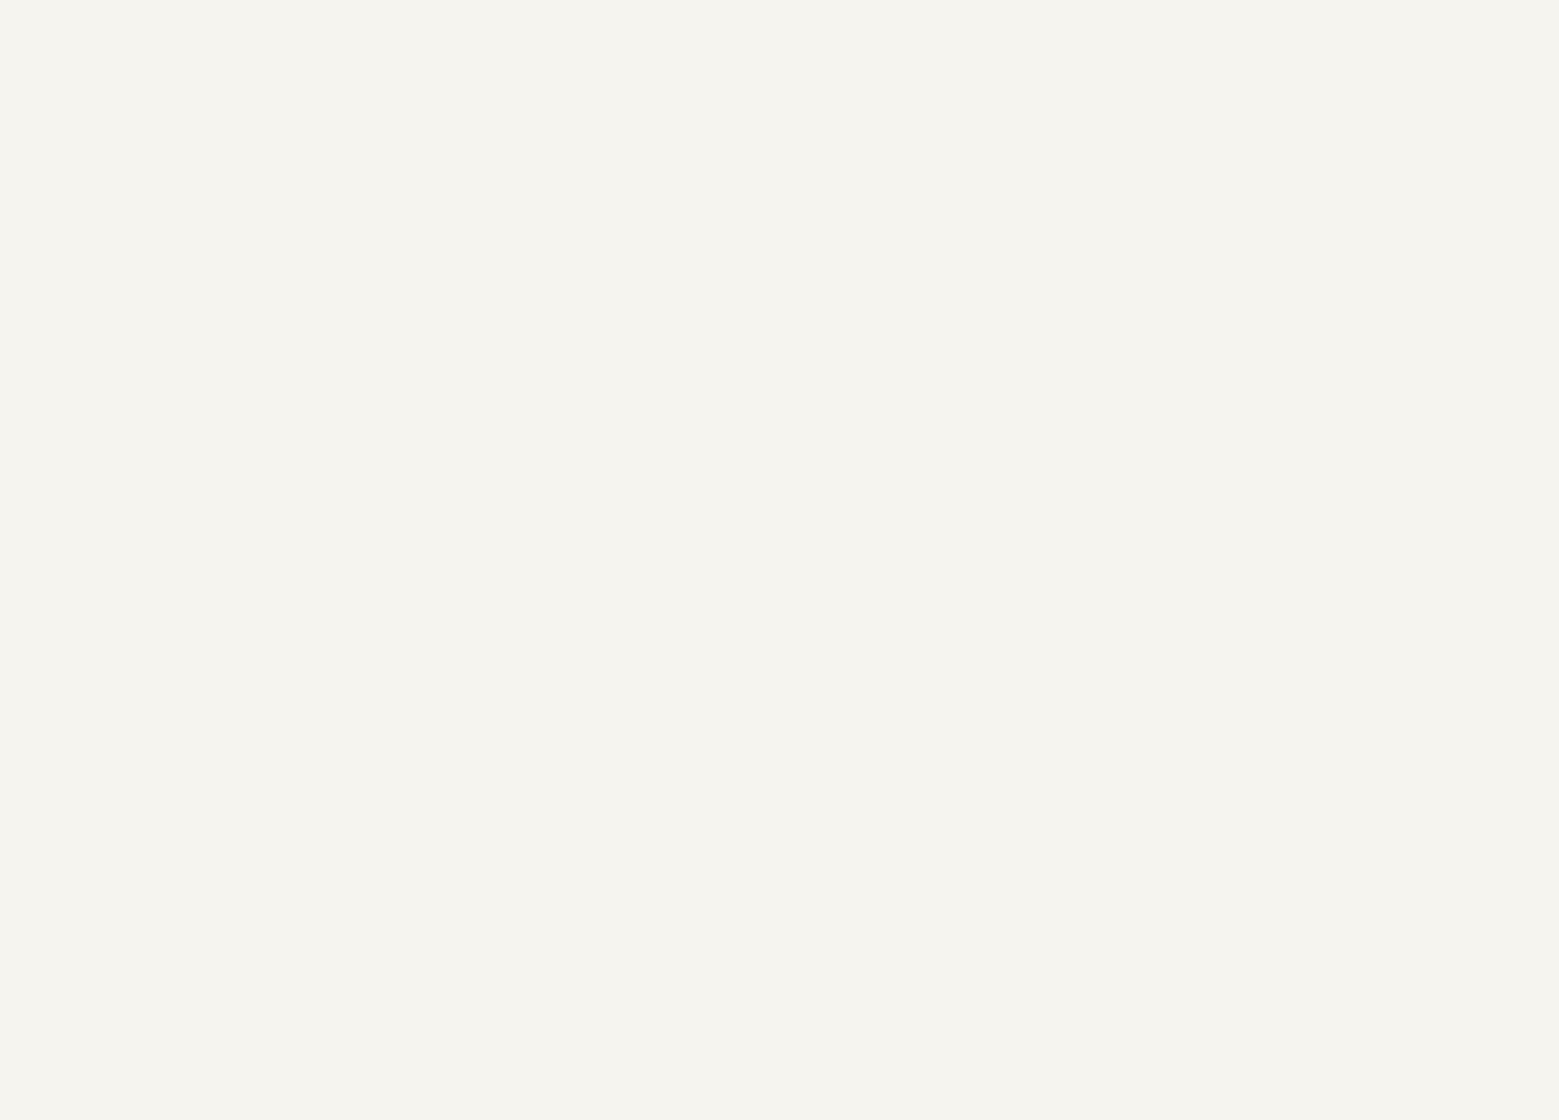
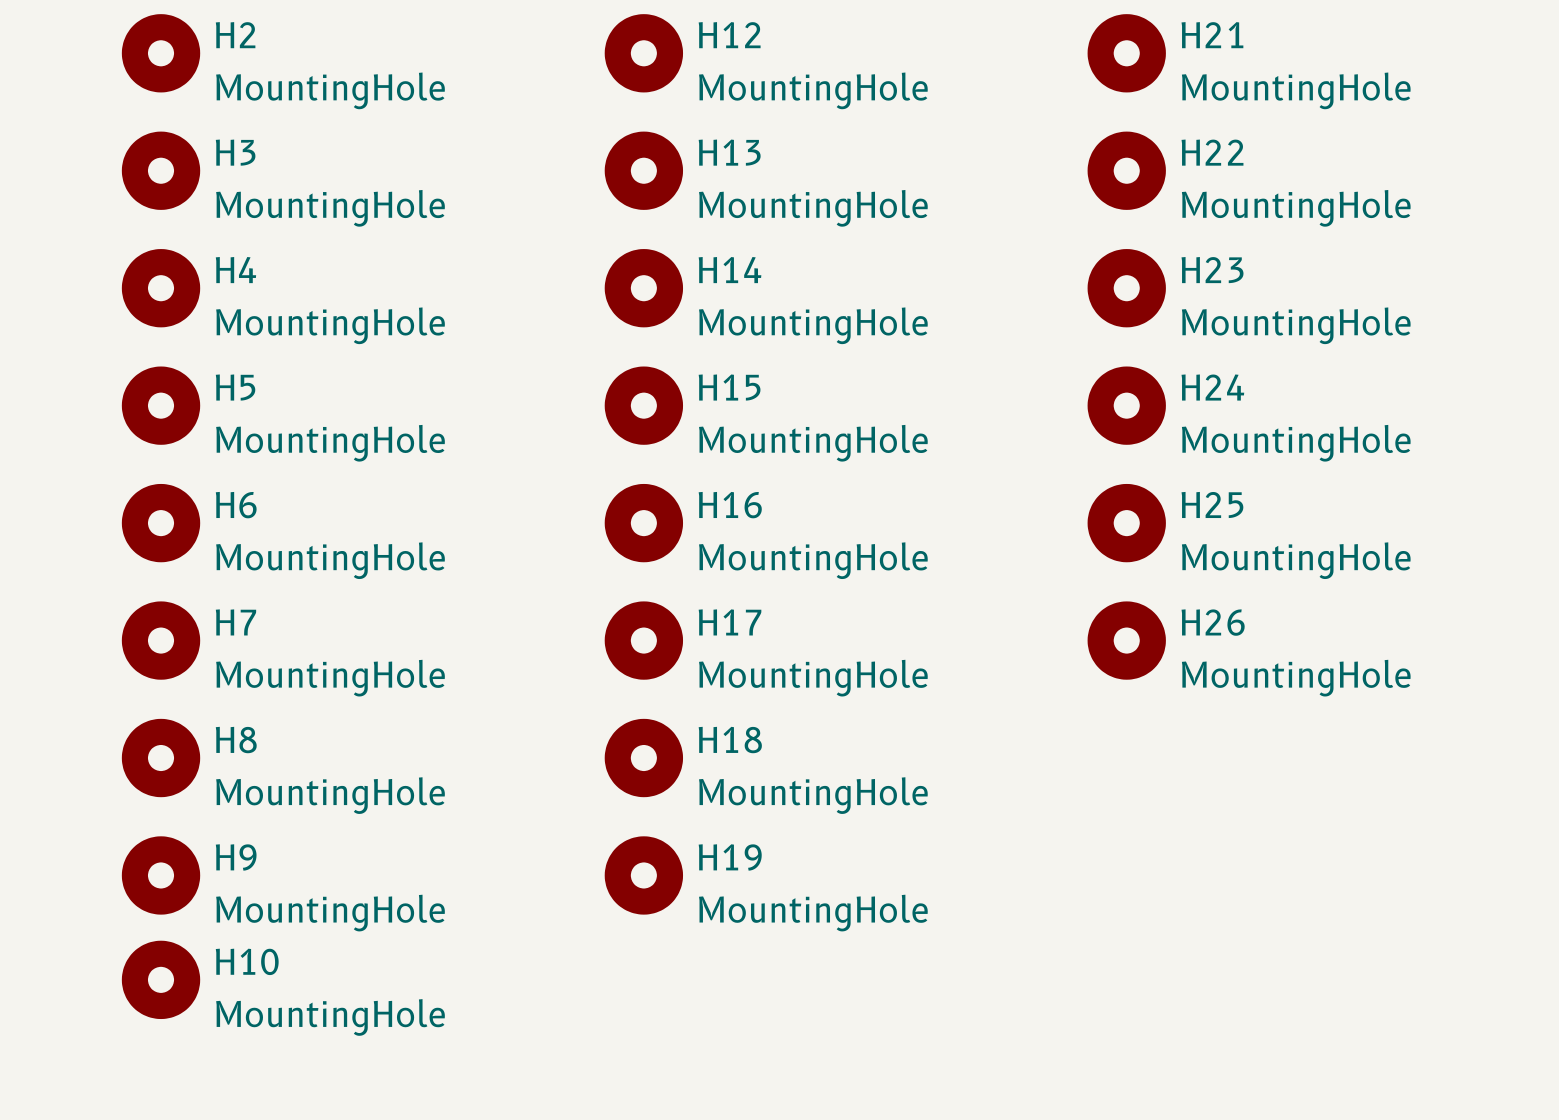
H2: none -> MountingHole (161, 53)
H12: none -> MountingHole (643, 53)
H21: none -> MountingHole (1126, 53)
H3: none -> MountingHole (161, 170)
H13: none -> MountingHole (643, 170)
H22: none -> MountingHole (1126, 170)
H4: none -> MountingHole (161, 288)
H14: none -> MountingHole (643, 288)
H23: none -> MountingHole (1126, 288)
H5: none -> MountingHole (161, 405)
H15: none -> MountingHole (643, 405)
H24: none -> MountingHole (1126, 405)
H6: none -> MountingHole (161, 523)
H16: none -> MountingHole (643, 523)
H25: none -> MountingHole (1126, 523)
H7: none -> MountingHole (161, 640)
H17: none -> MountingHole (643, 640)
H26: none -> MountingHole (1126, 640)
H8: none -> MountingHole (161, 758)
H18: none -> MountingHole (643, 758)
H9: none -> MountingHole (161, 875)
H19: none -> MountingHole (643, 875)
H10: none -> MountingHole (161, 979)

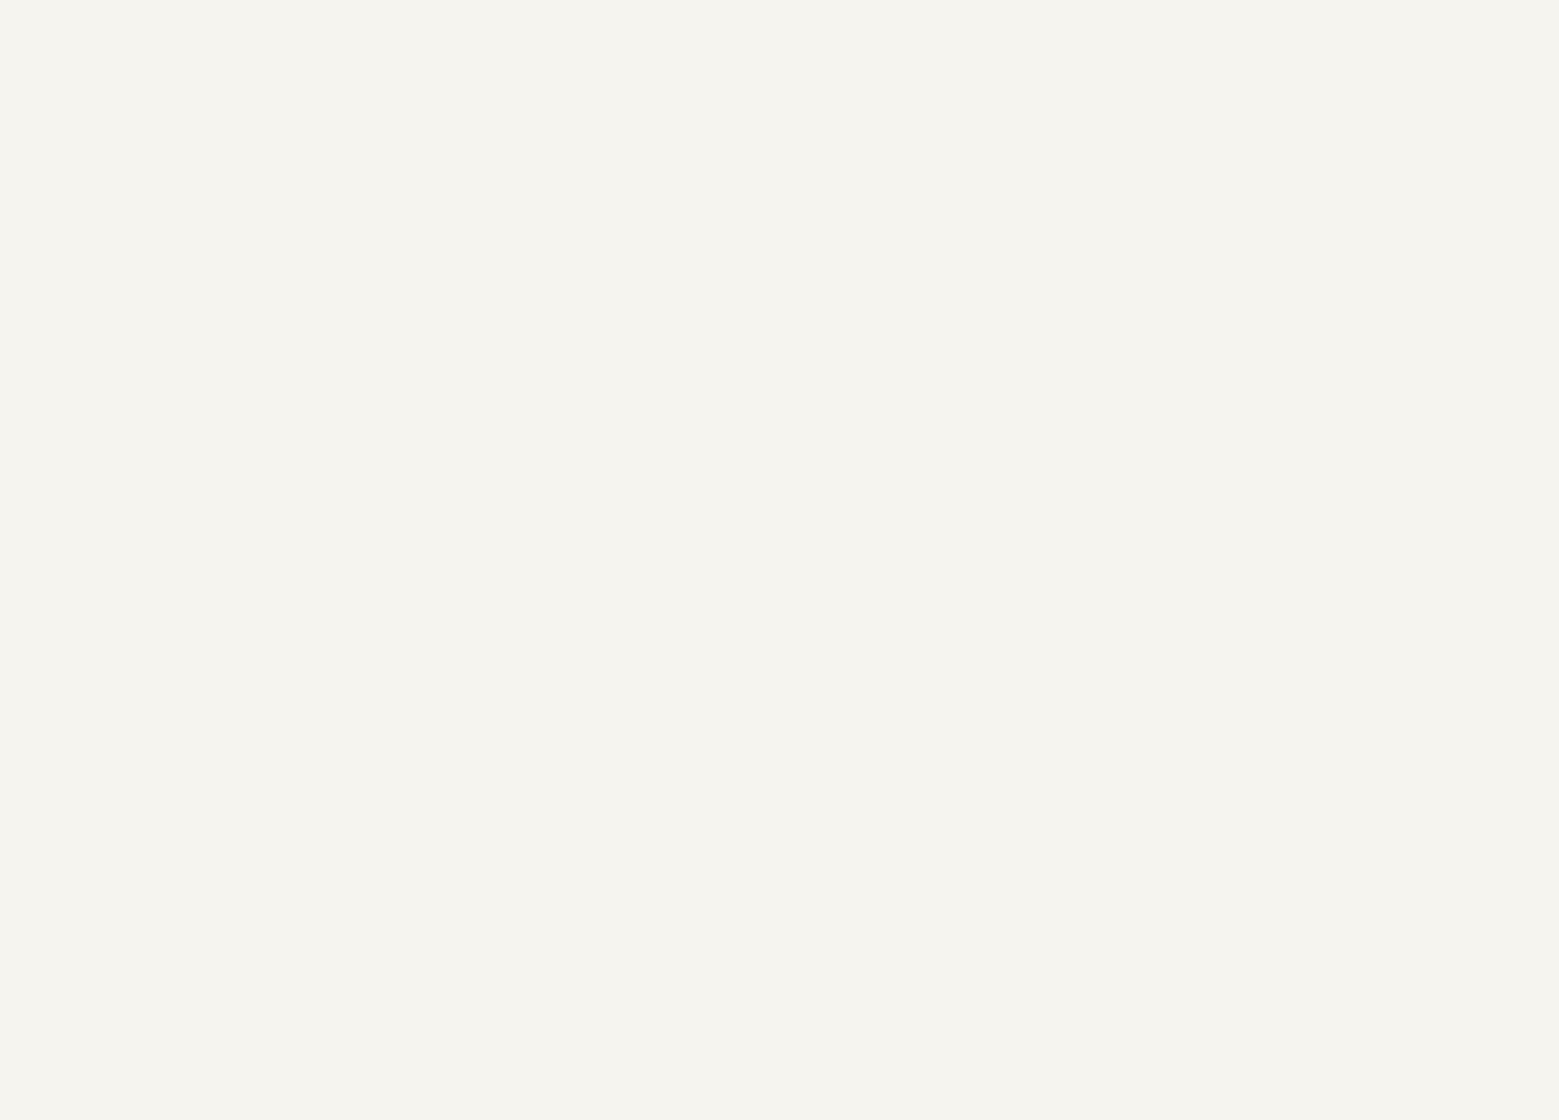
H2: MountingHole (161, 53) -> none
H12: MountingHole (643, 53) -> none
H21: MountingHole (1126, 53) -> none
H3: MountingHole (161, 170) -> none
H13: MountingHole (643, 170) -> none
H22: MountingHole (1126, 170) -> none
H4: MountingHole (161, 288) -> none
H14: MountingHole (643, 288) -> none
H23: MountingHole (1126, 288) -> none
H5: MountingHole (161, 405) -> none
H15: MountingHole (643, 405) -> none
H24: MountingHole (1126, 405) -> none
H6: MountingHole (161, 523) -> none
H16: MountingHole (643, 523) -> none
H25: MountingHole (1126, 523) -> none
H7: MountingHole (161, 640) -> none
H17: MountingHole (643, 640) -> none
H26: MountingHole (1126, 640) -> none
H8: MountingHole (161, 758) -> none
H18: MountingHole (643, 758) -> none
H9: MountingHole (161, 875) -> none
H19: MountingHole (643, 875) -> none
H10: MountingHole (161, 979) -> none

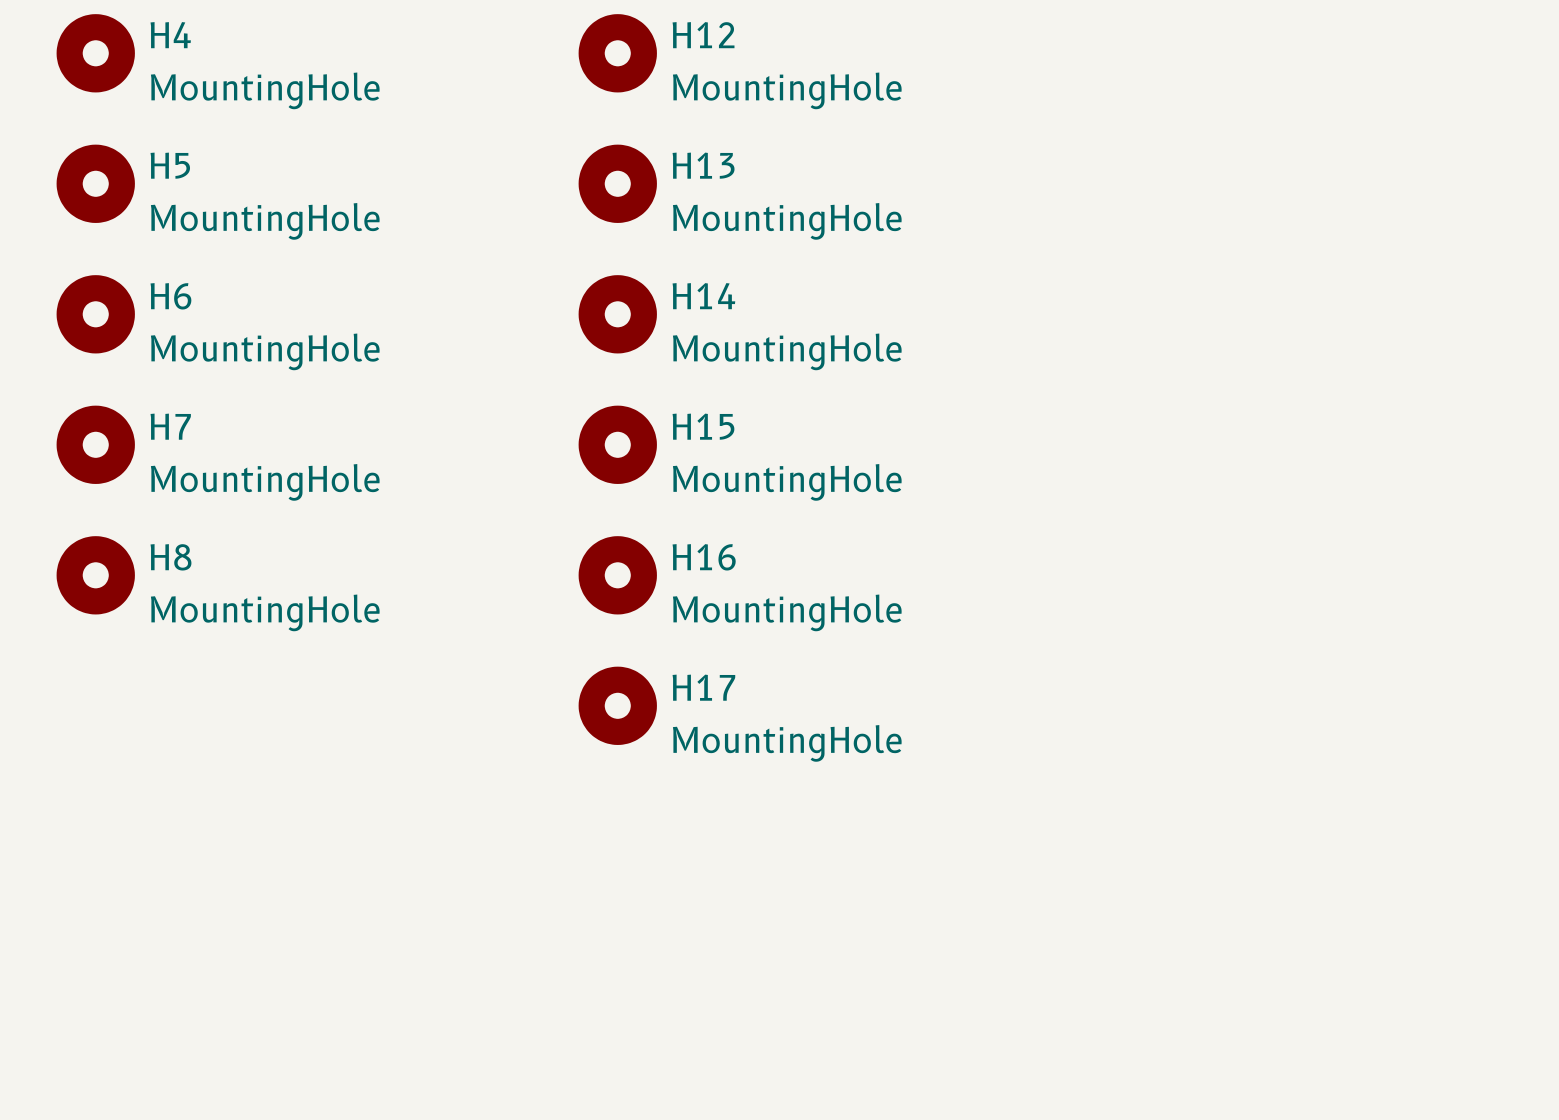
H4: none -> MountingHole (95, 53)
H12: none -> MountingHole (617, 53)
H5: none -> MountingHole (95, 183)
H13: none -> MountingHole (617, 183)
H6: none -> MountingHole (95, 314)
H14: none -> MountingHole (617, 314)
H7: none -> MountingHole (95, 444)
H15: none -> MountingHole (617, 444)
H8: none -> MountingHole (95, 575)
H16: none -> MountingHole (617, 575)
H17: none -> MountingHole (617, 705)

